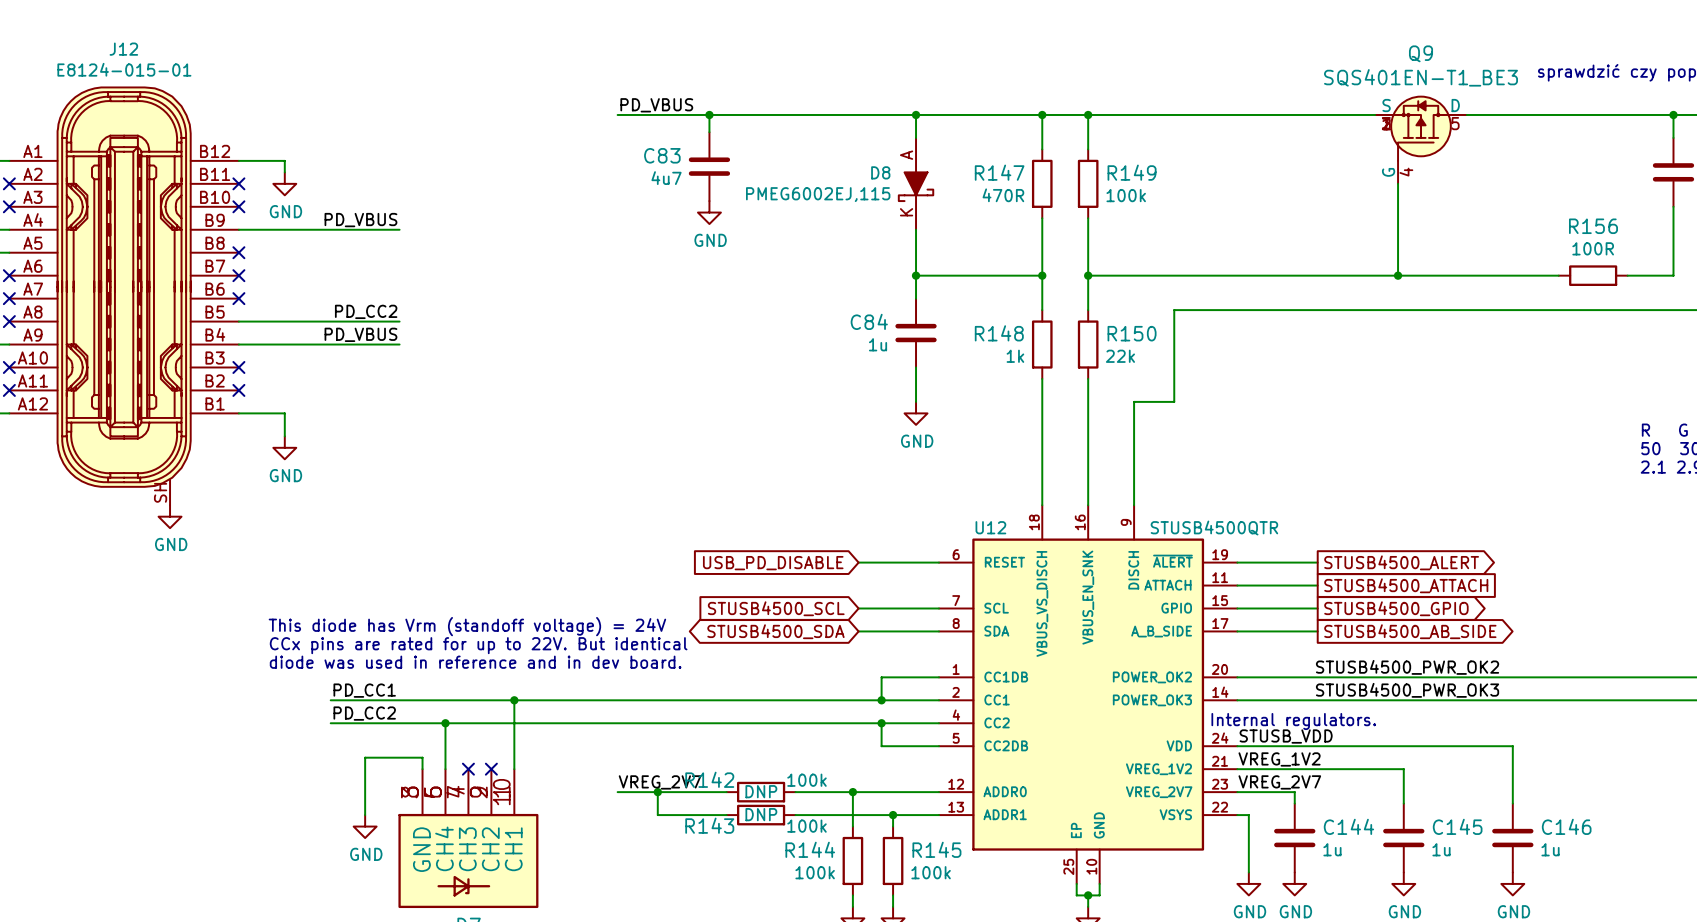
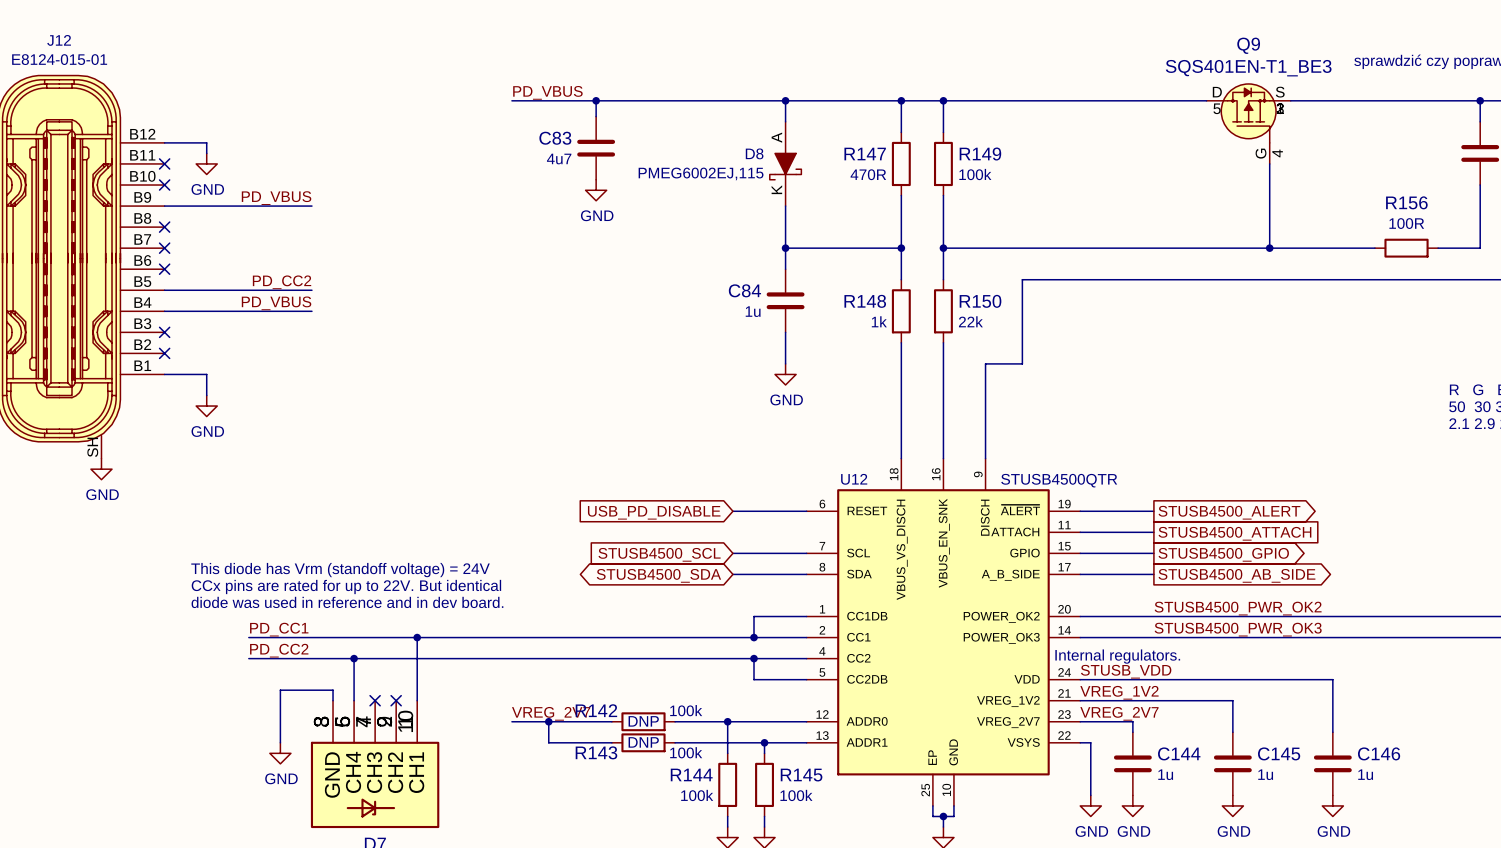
Q9 flip: as is (1421, 128) -> left-right (1248, 113)
wire: (1398, 183) (1398, 275) -> (1269, 163) (1269, 248)
junction position: (1398, 275) -> (1269, 248)

